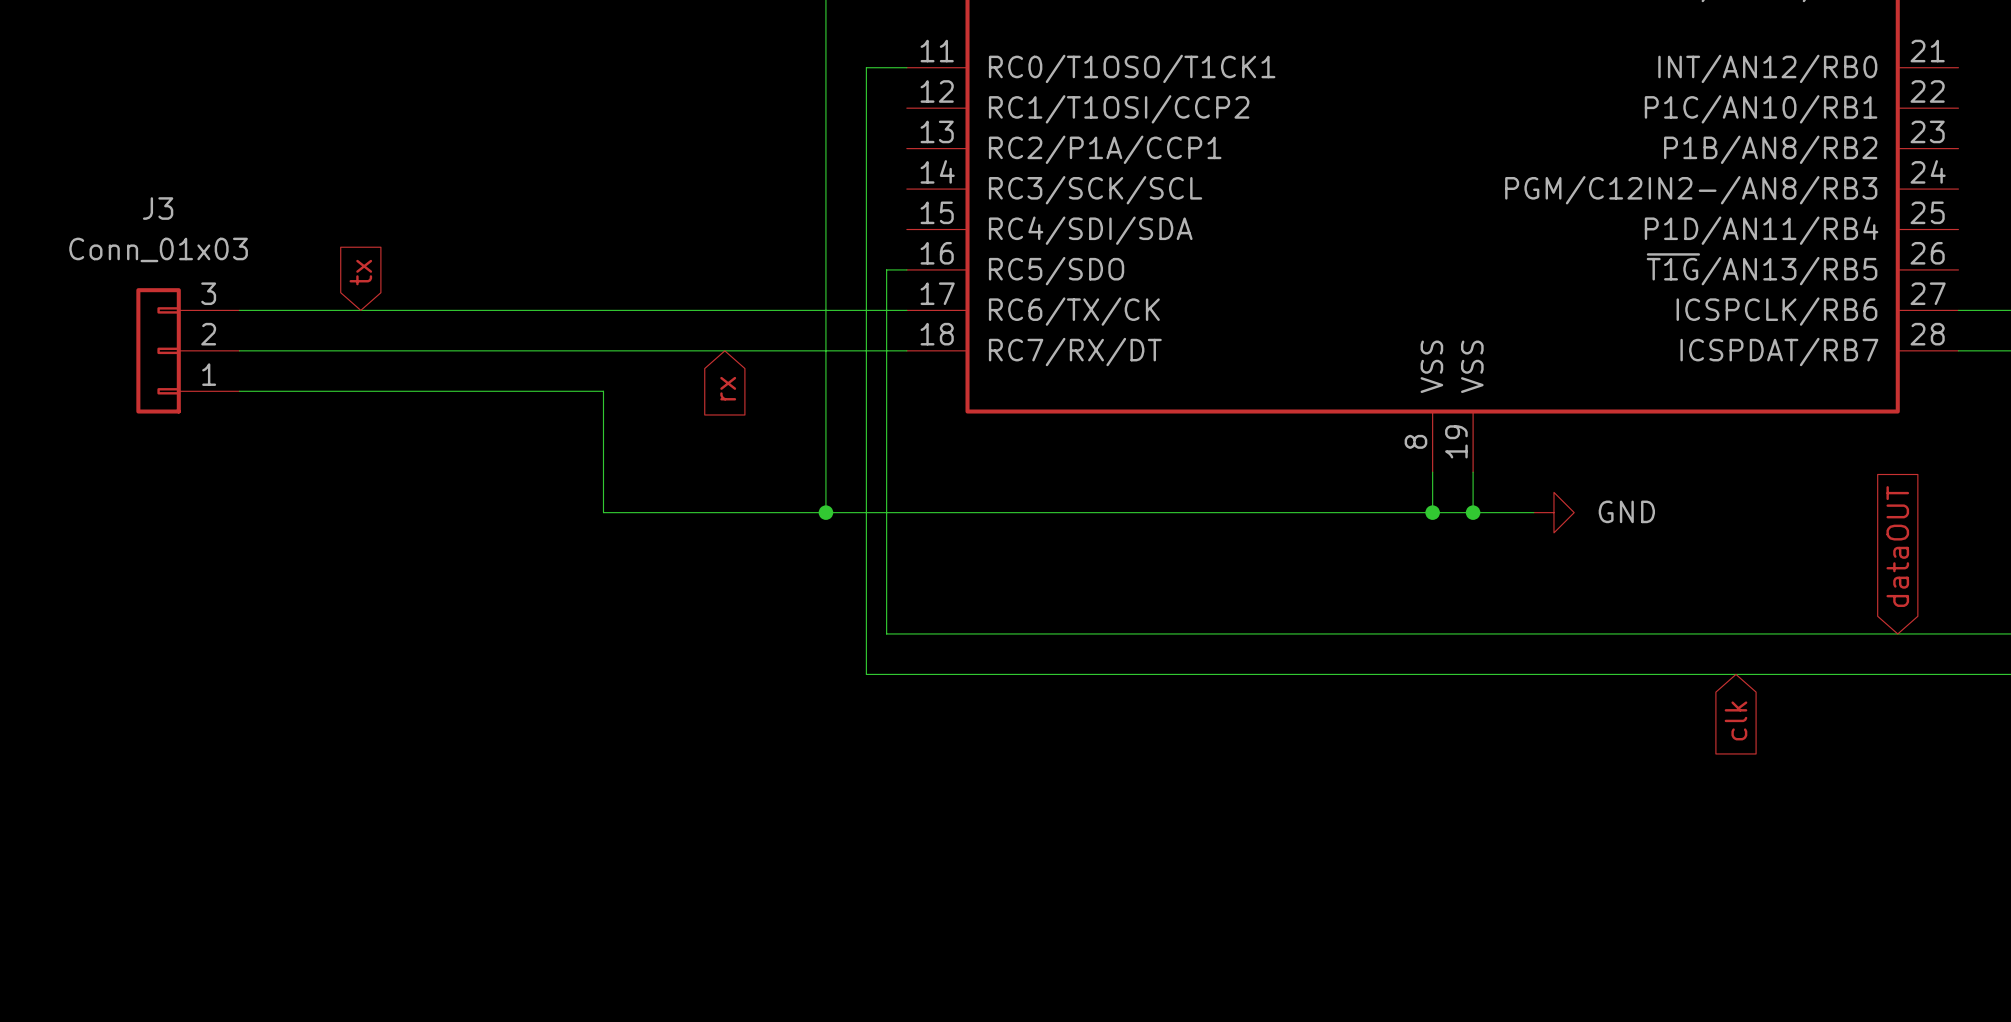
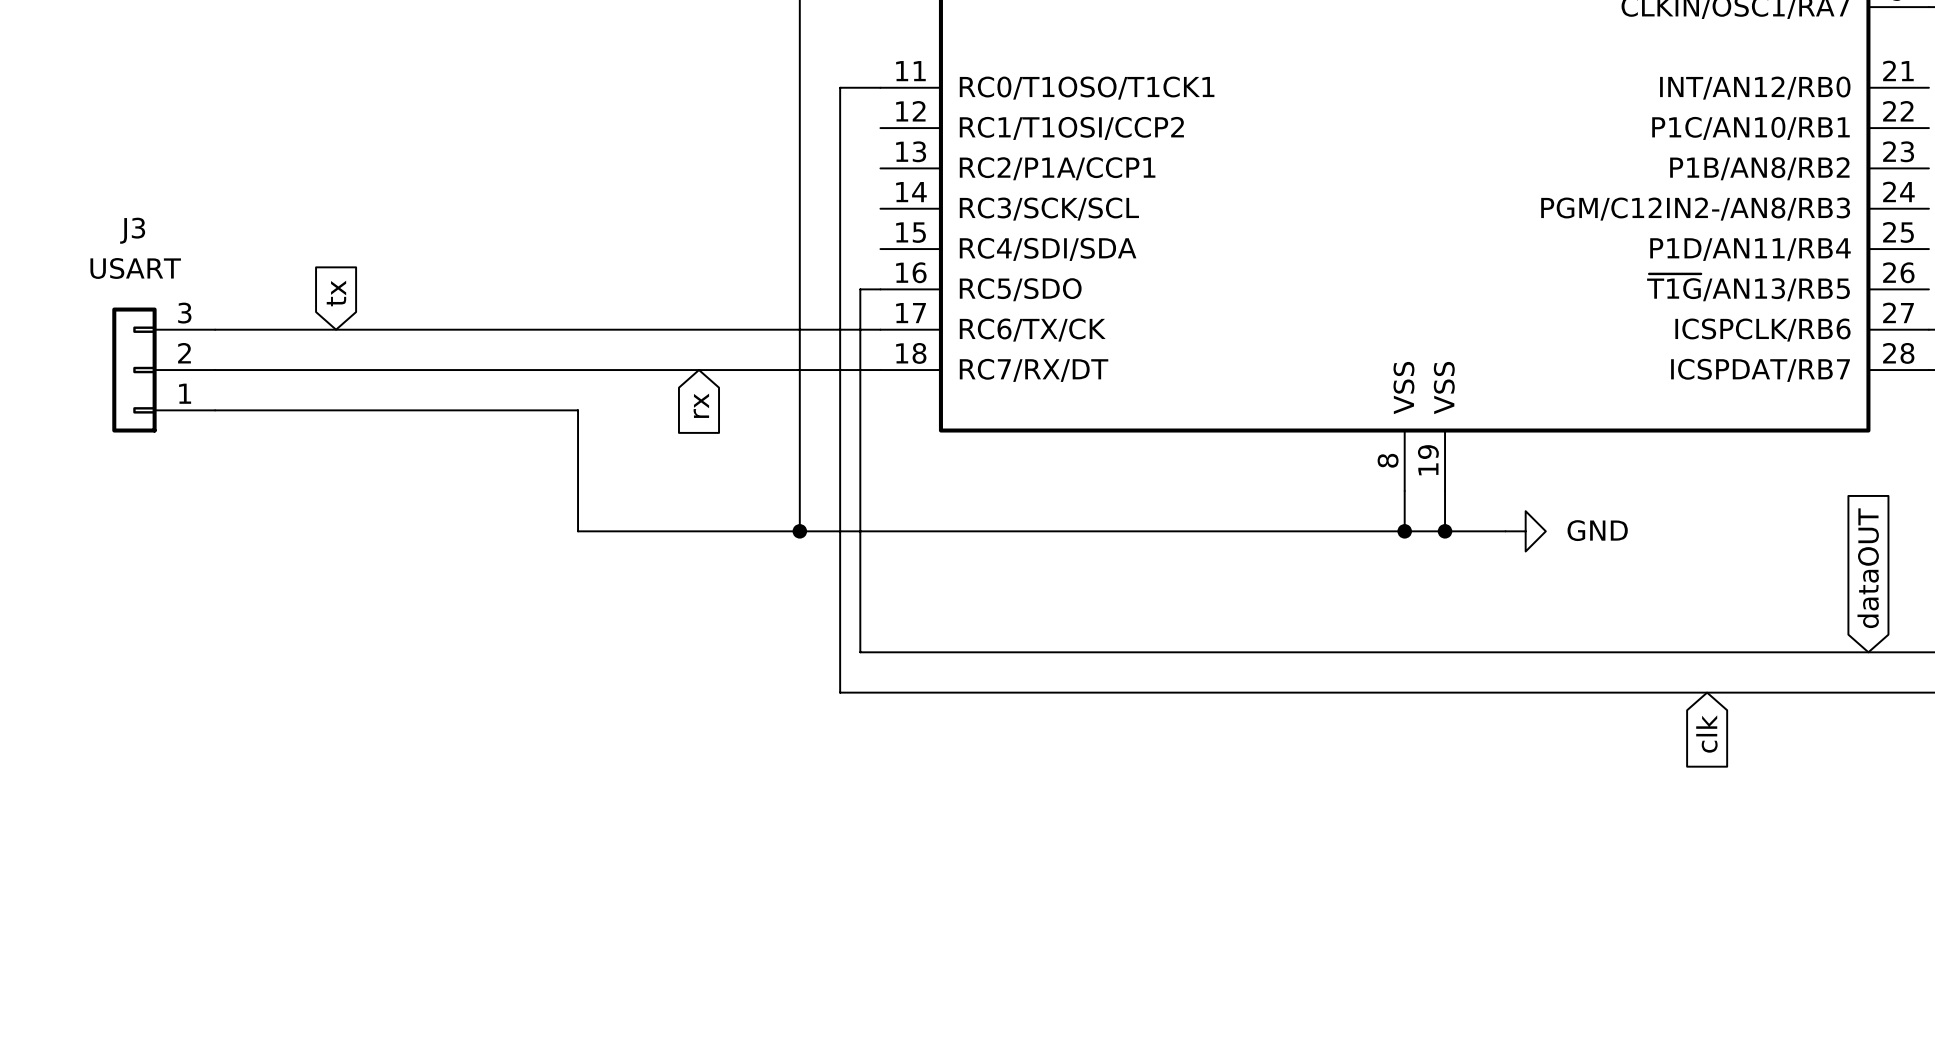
J3 value: Conn_01x03 (158, 249) -> USART (135, 268)

